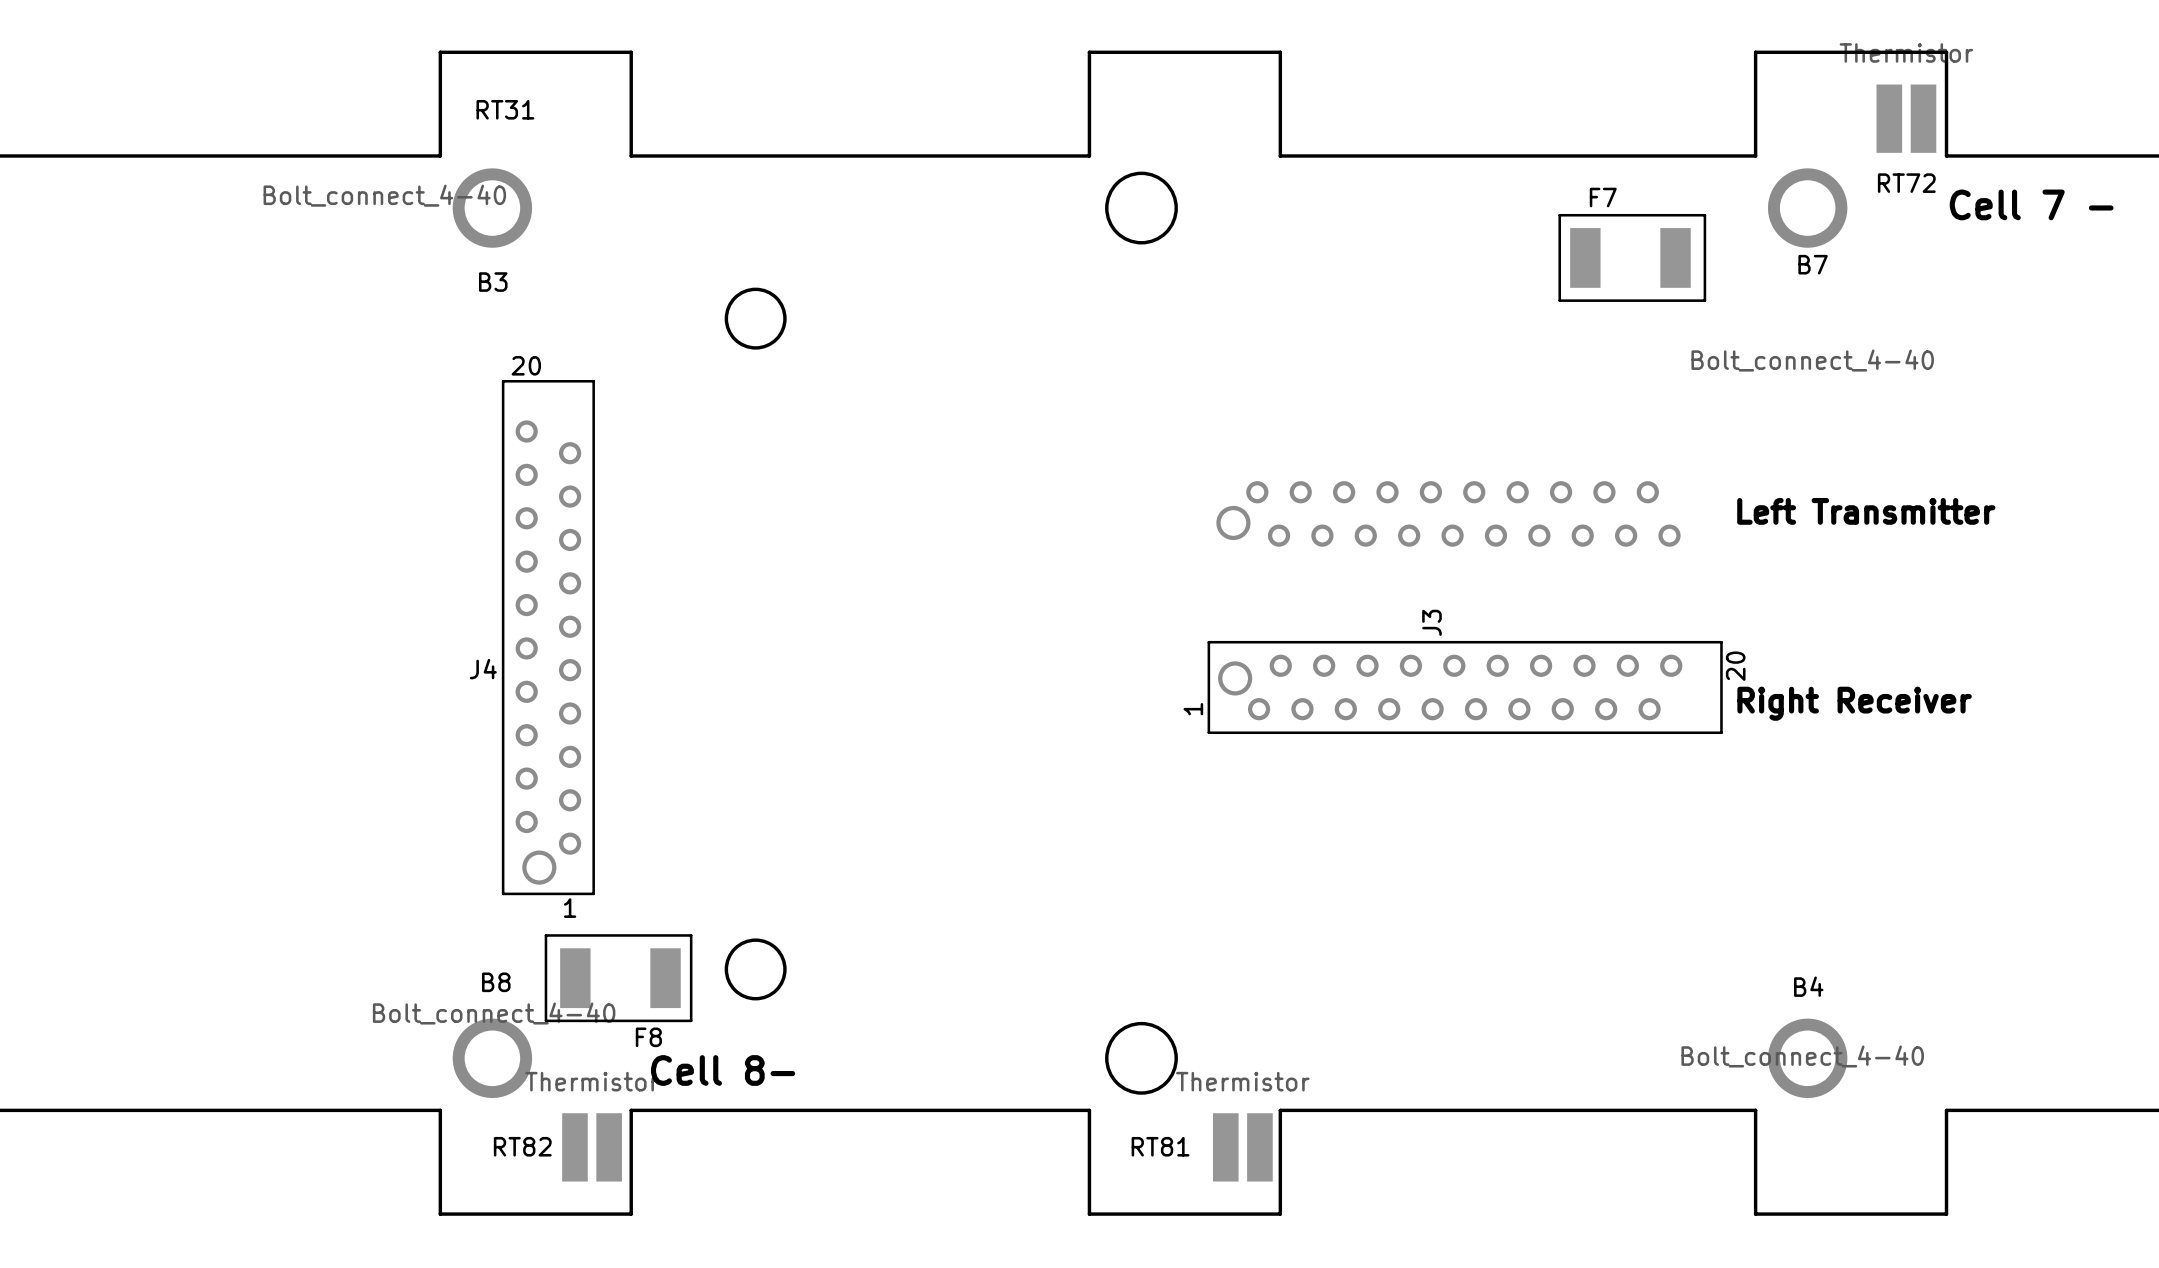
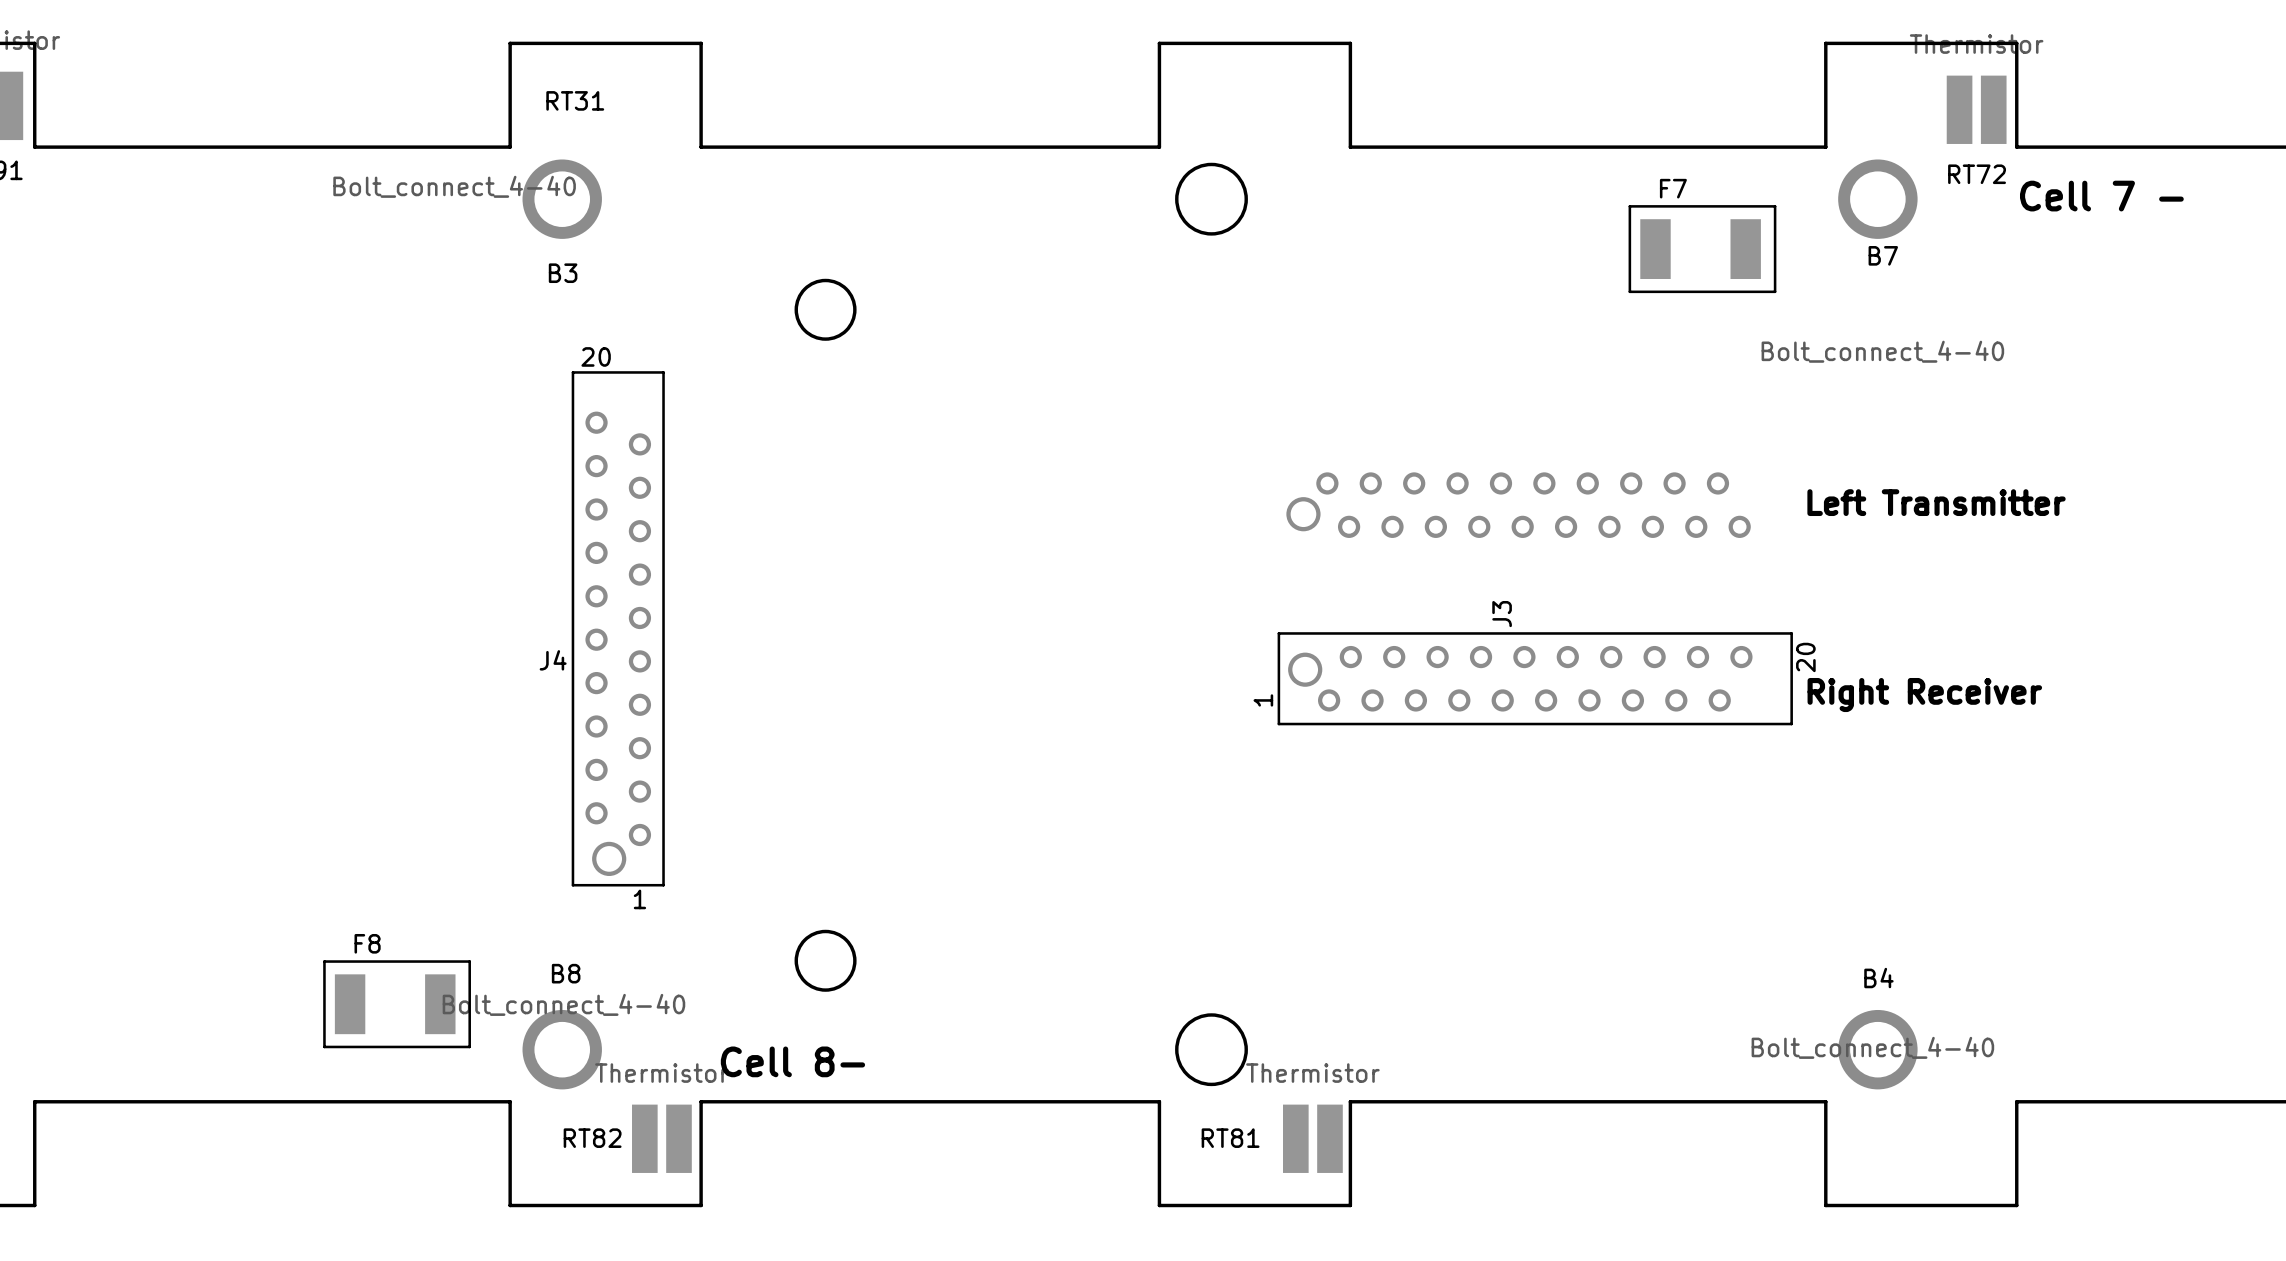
F8 rotation: 0° (618, 978) -> 180° (397, 1004)
F8 position: (618, 978) -> (397, 1004)

